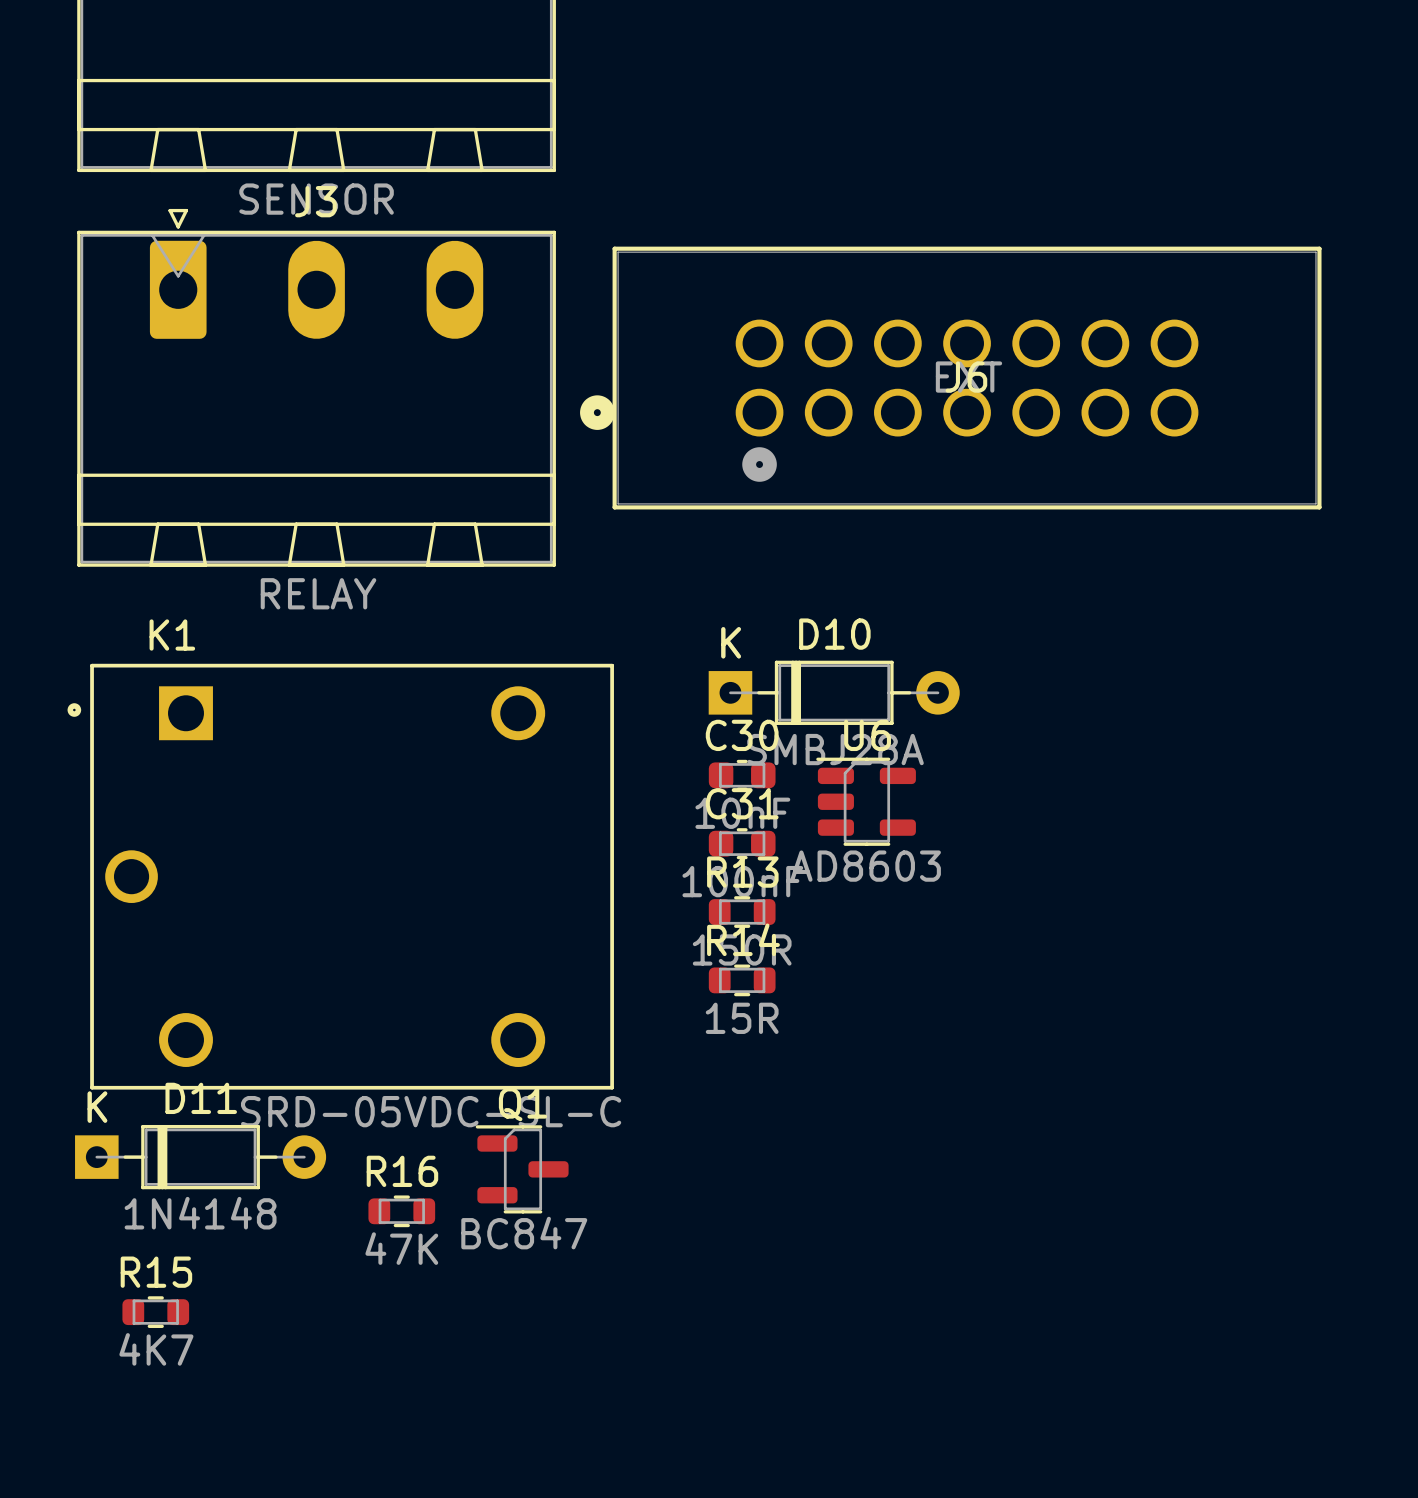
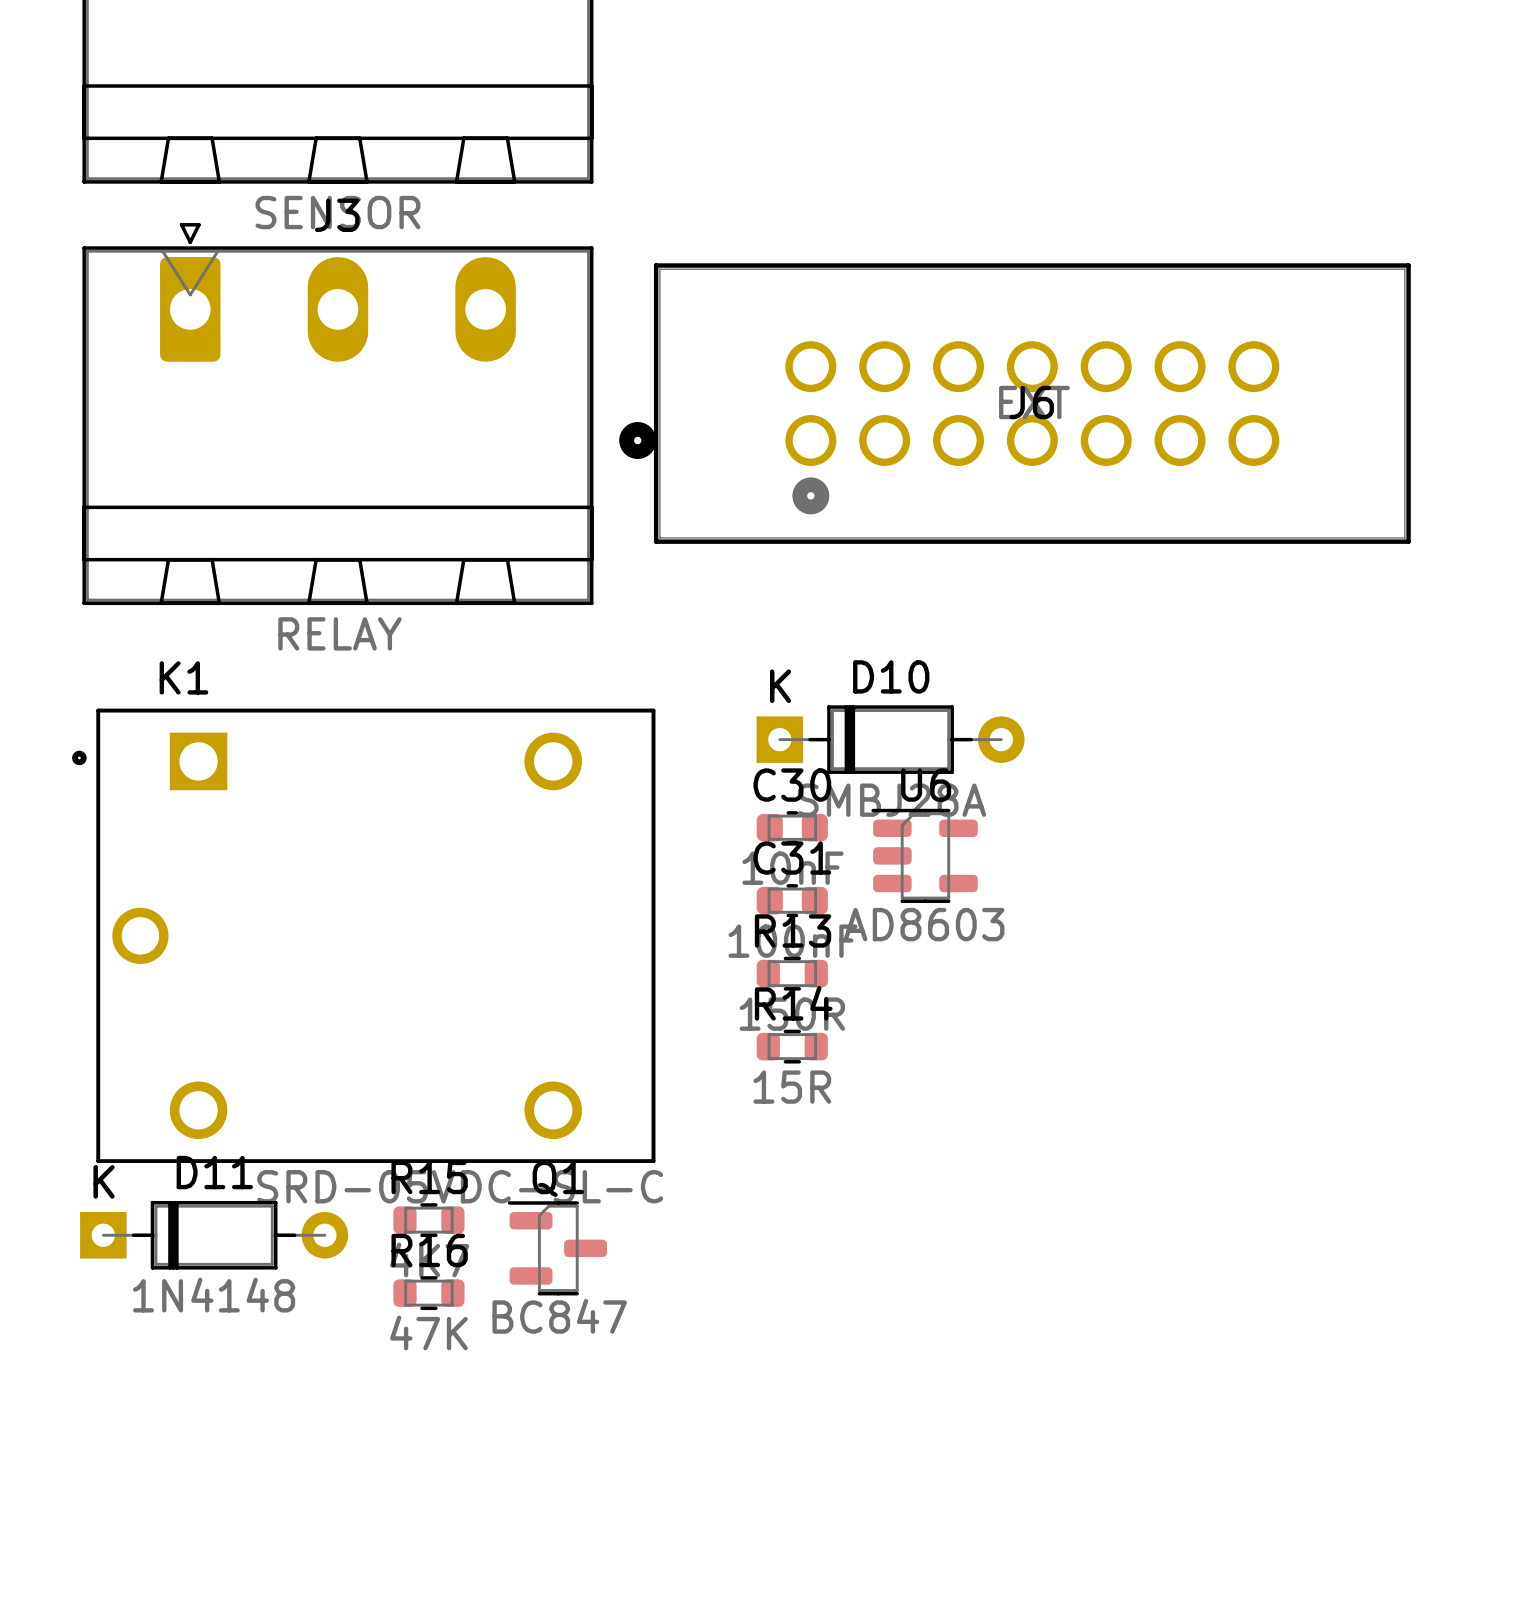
R15 position: (155, 1312) -> (428, 1220)

